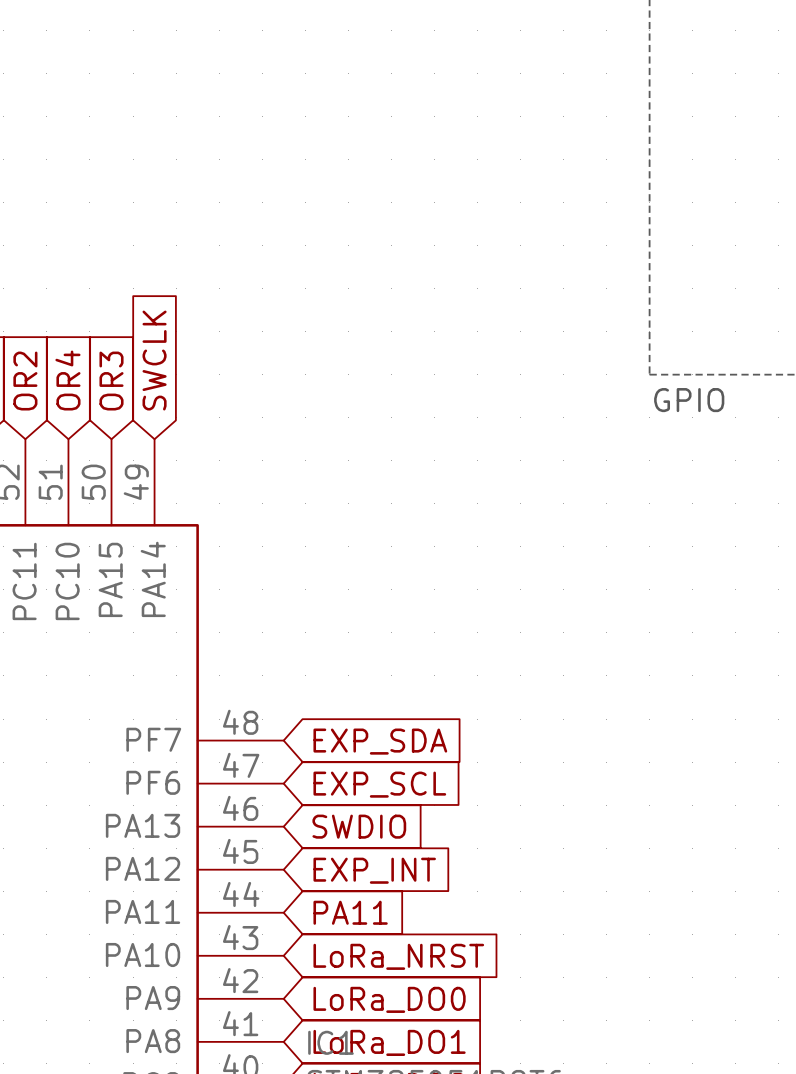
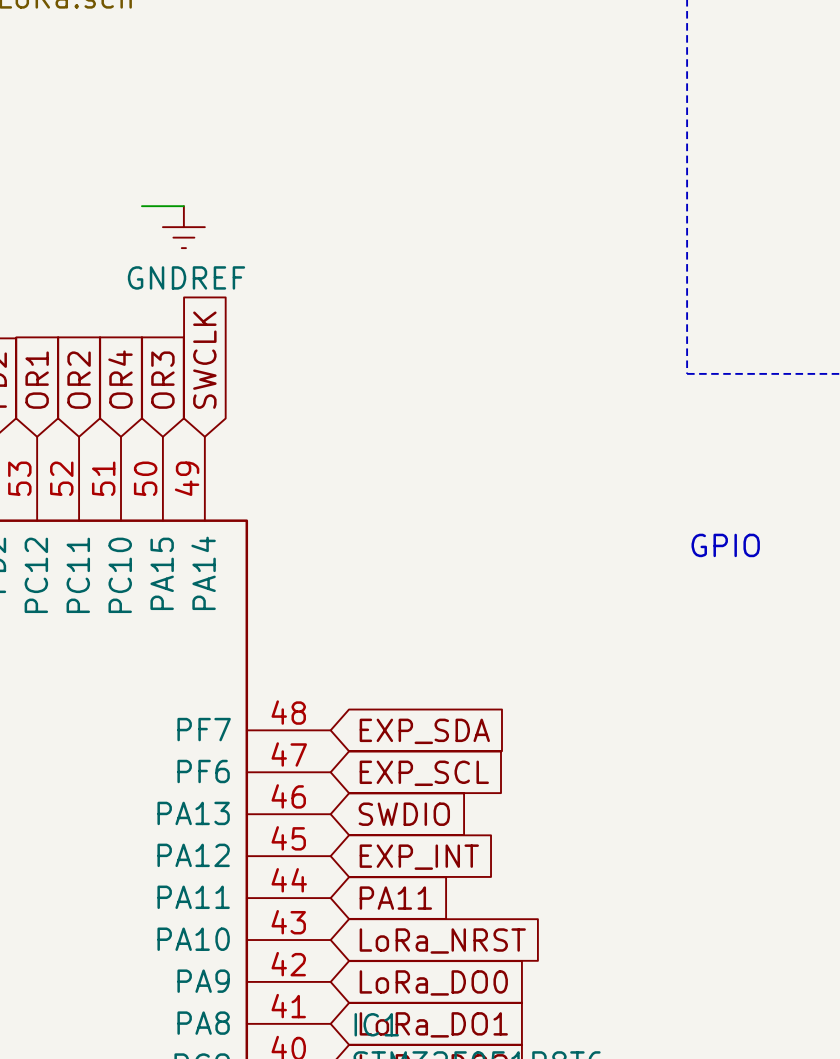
wire: none -> (141, 206) (183, 206)
power symbol: none -> GNDREF (183, 227)
text position: GPIO (689, 400) -> GPIO (725, 545)

